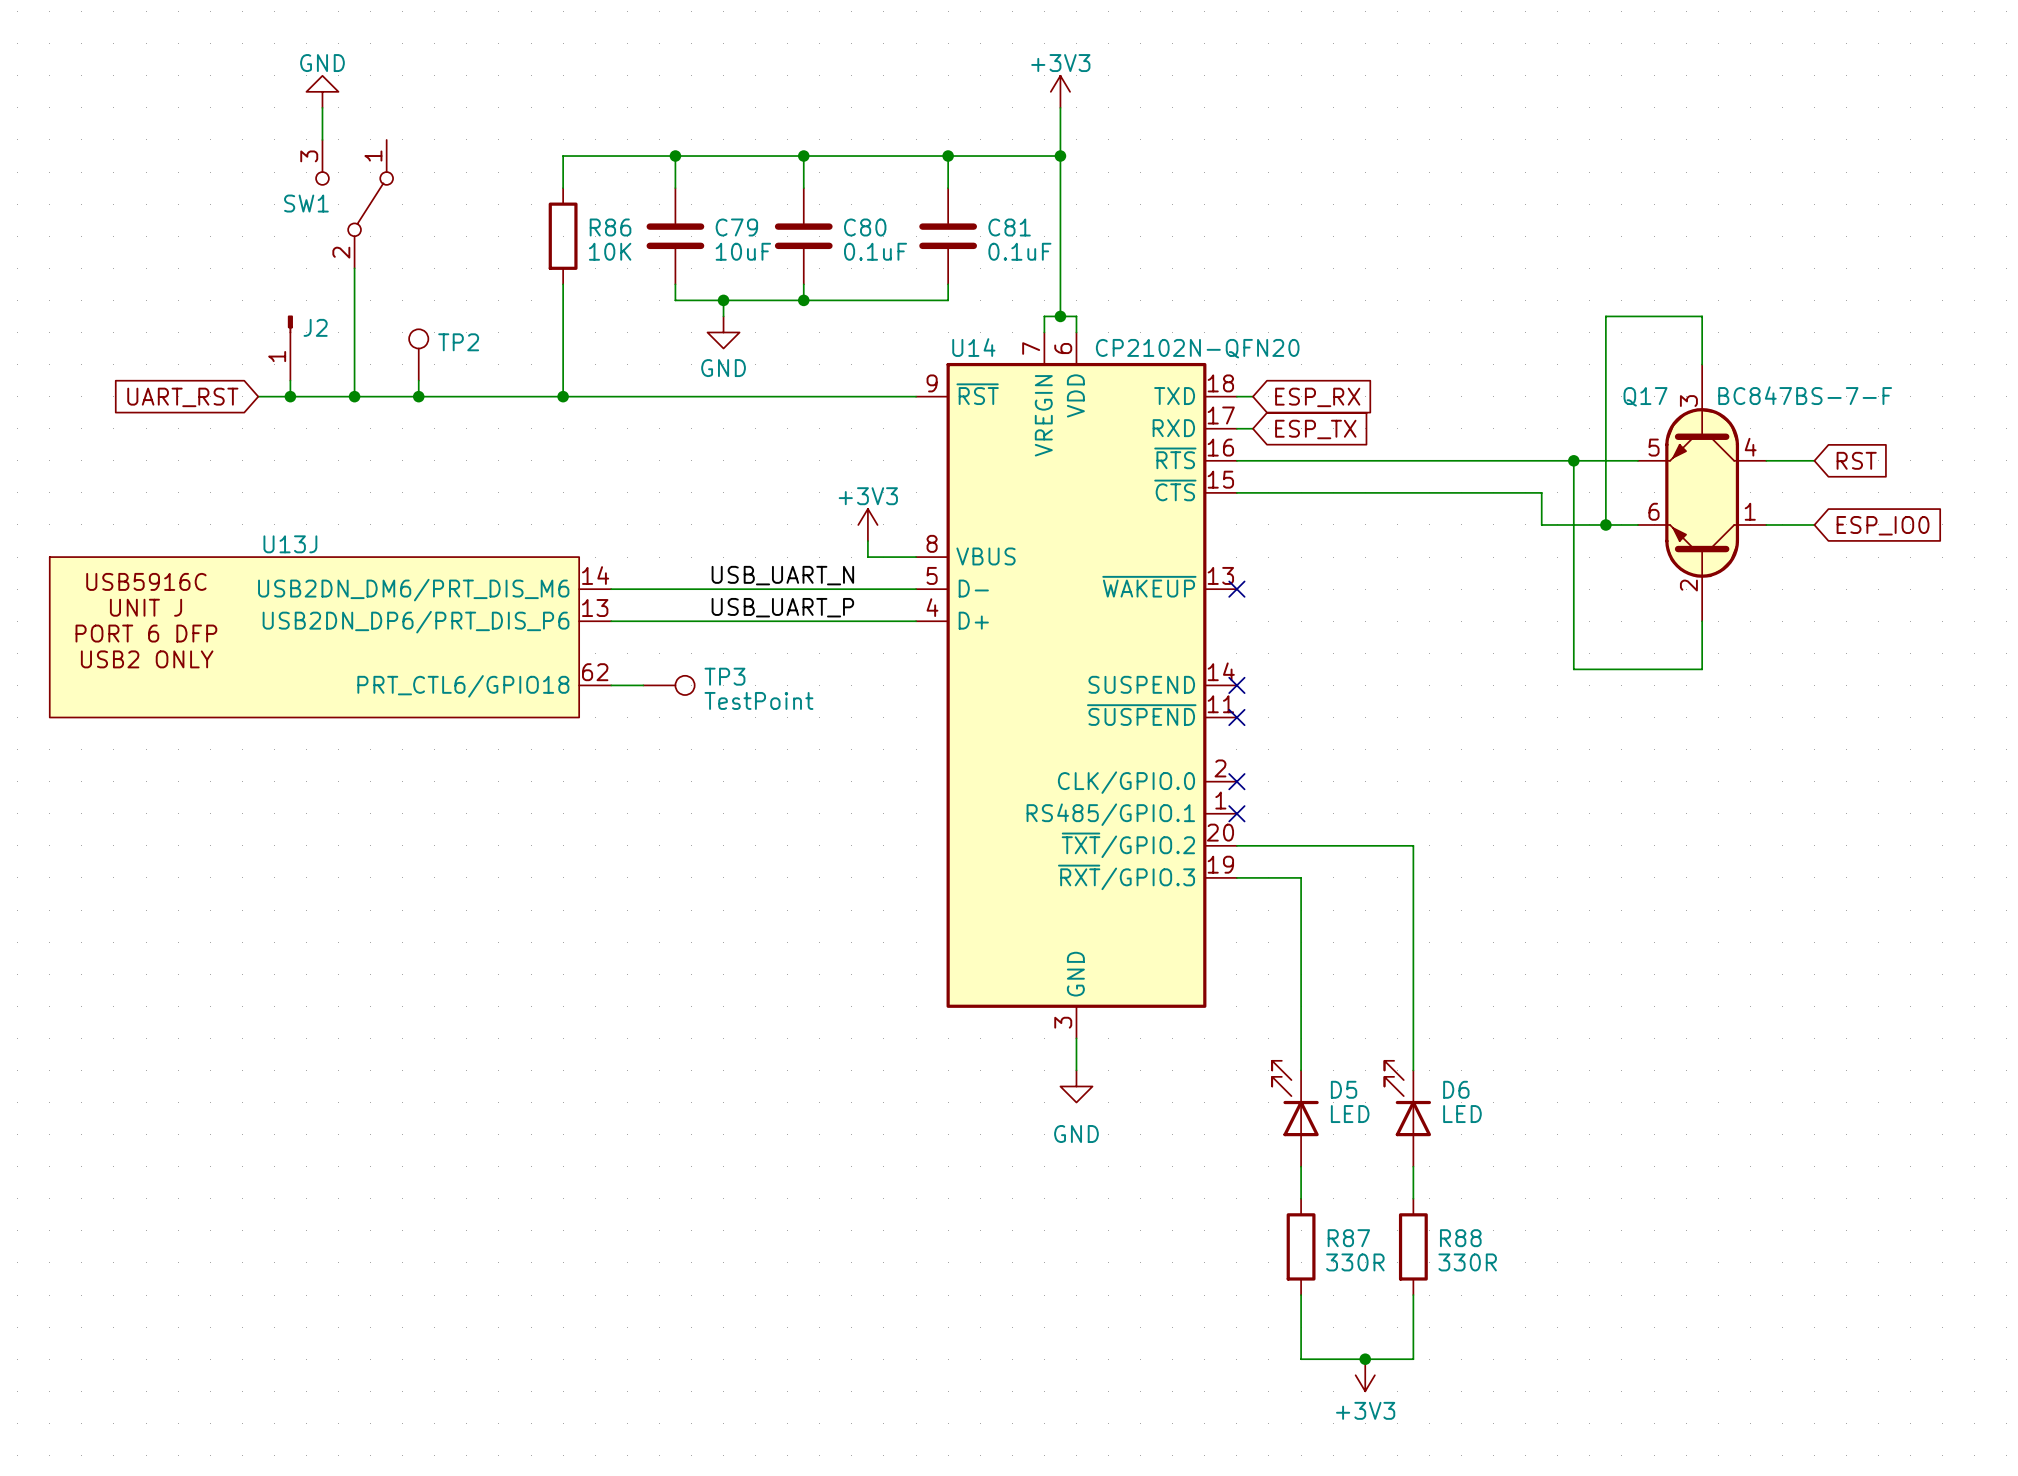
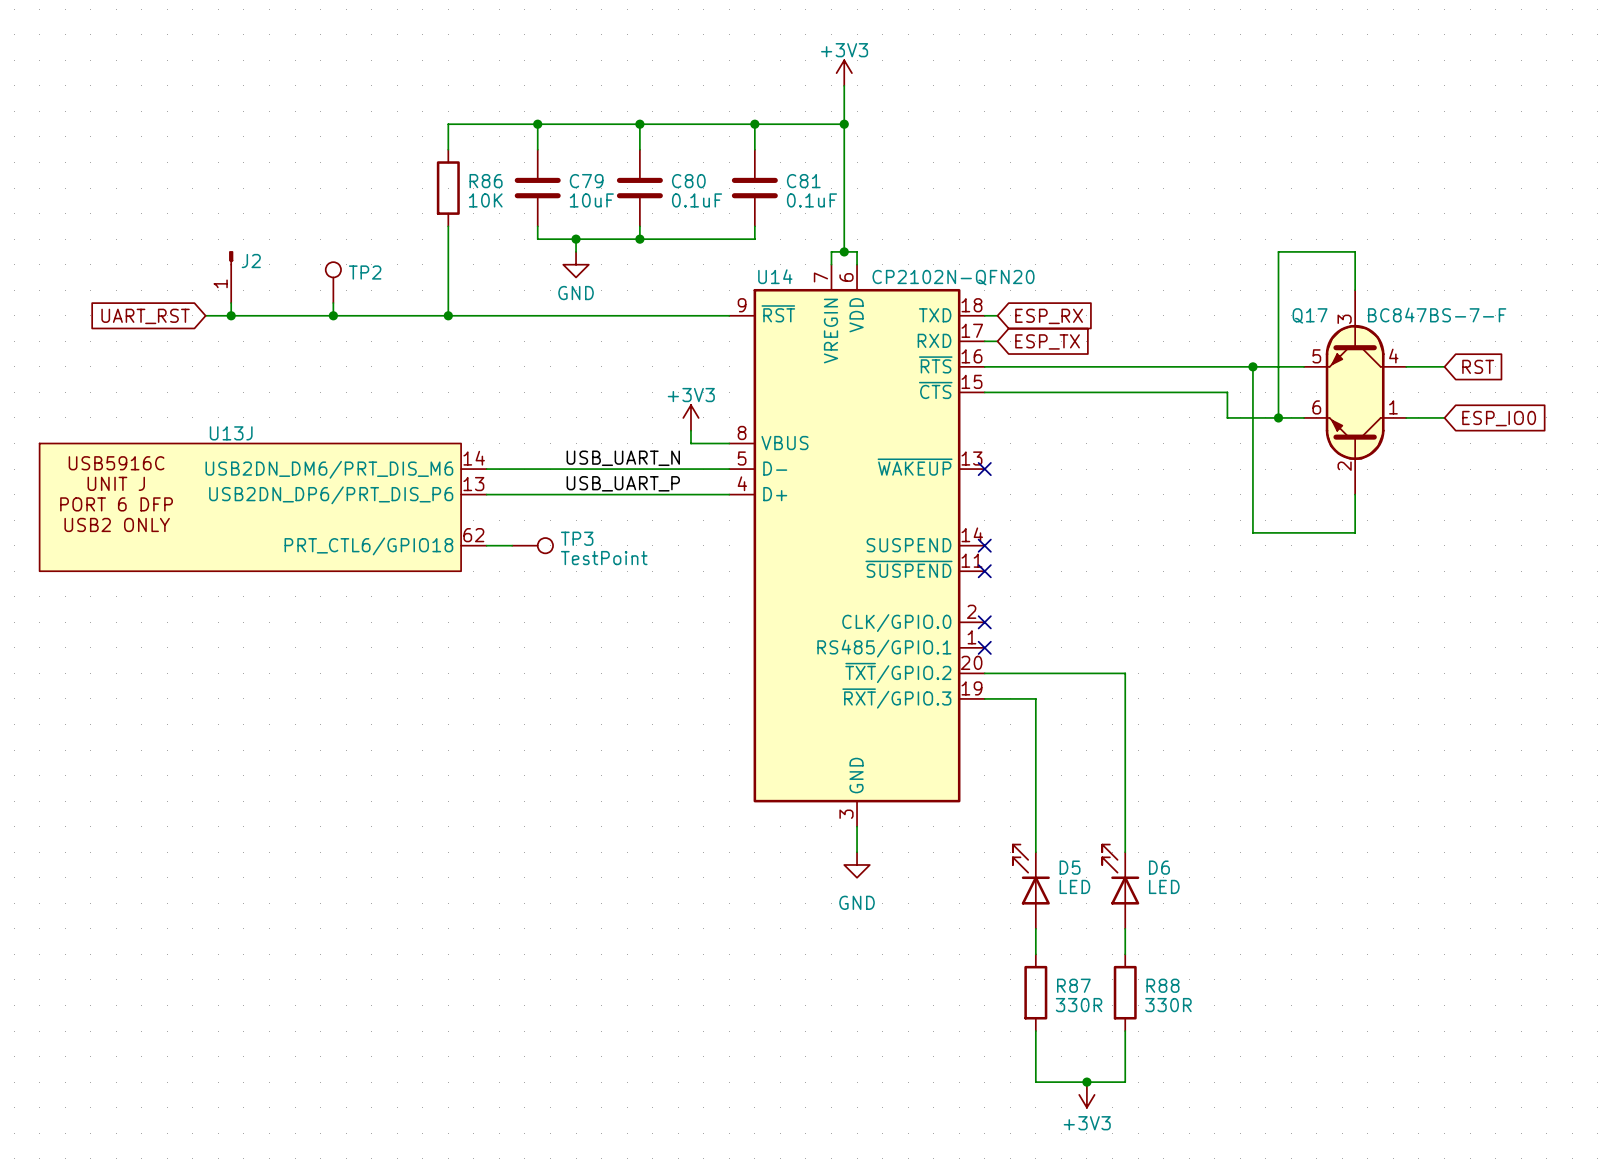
power symbol: GND (322, 91) -> none
wire: (322, 107) (322, 139) -> none
SW1: (354, 204) -> none
wire: (354, 268) (354, 396) -> none
junction: (354, 396) -> none

